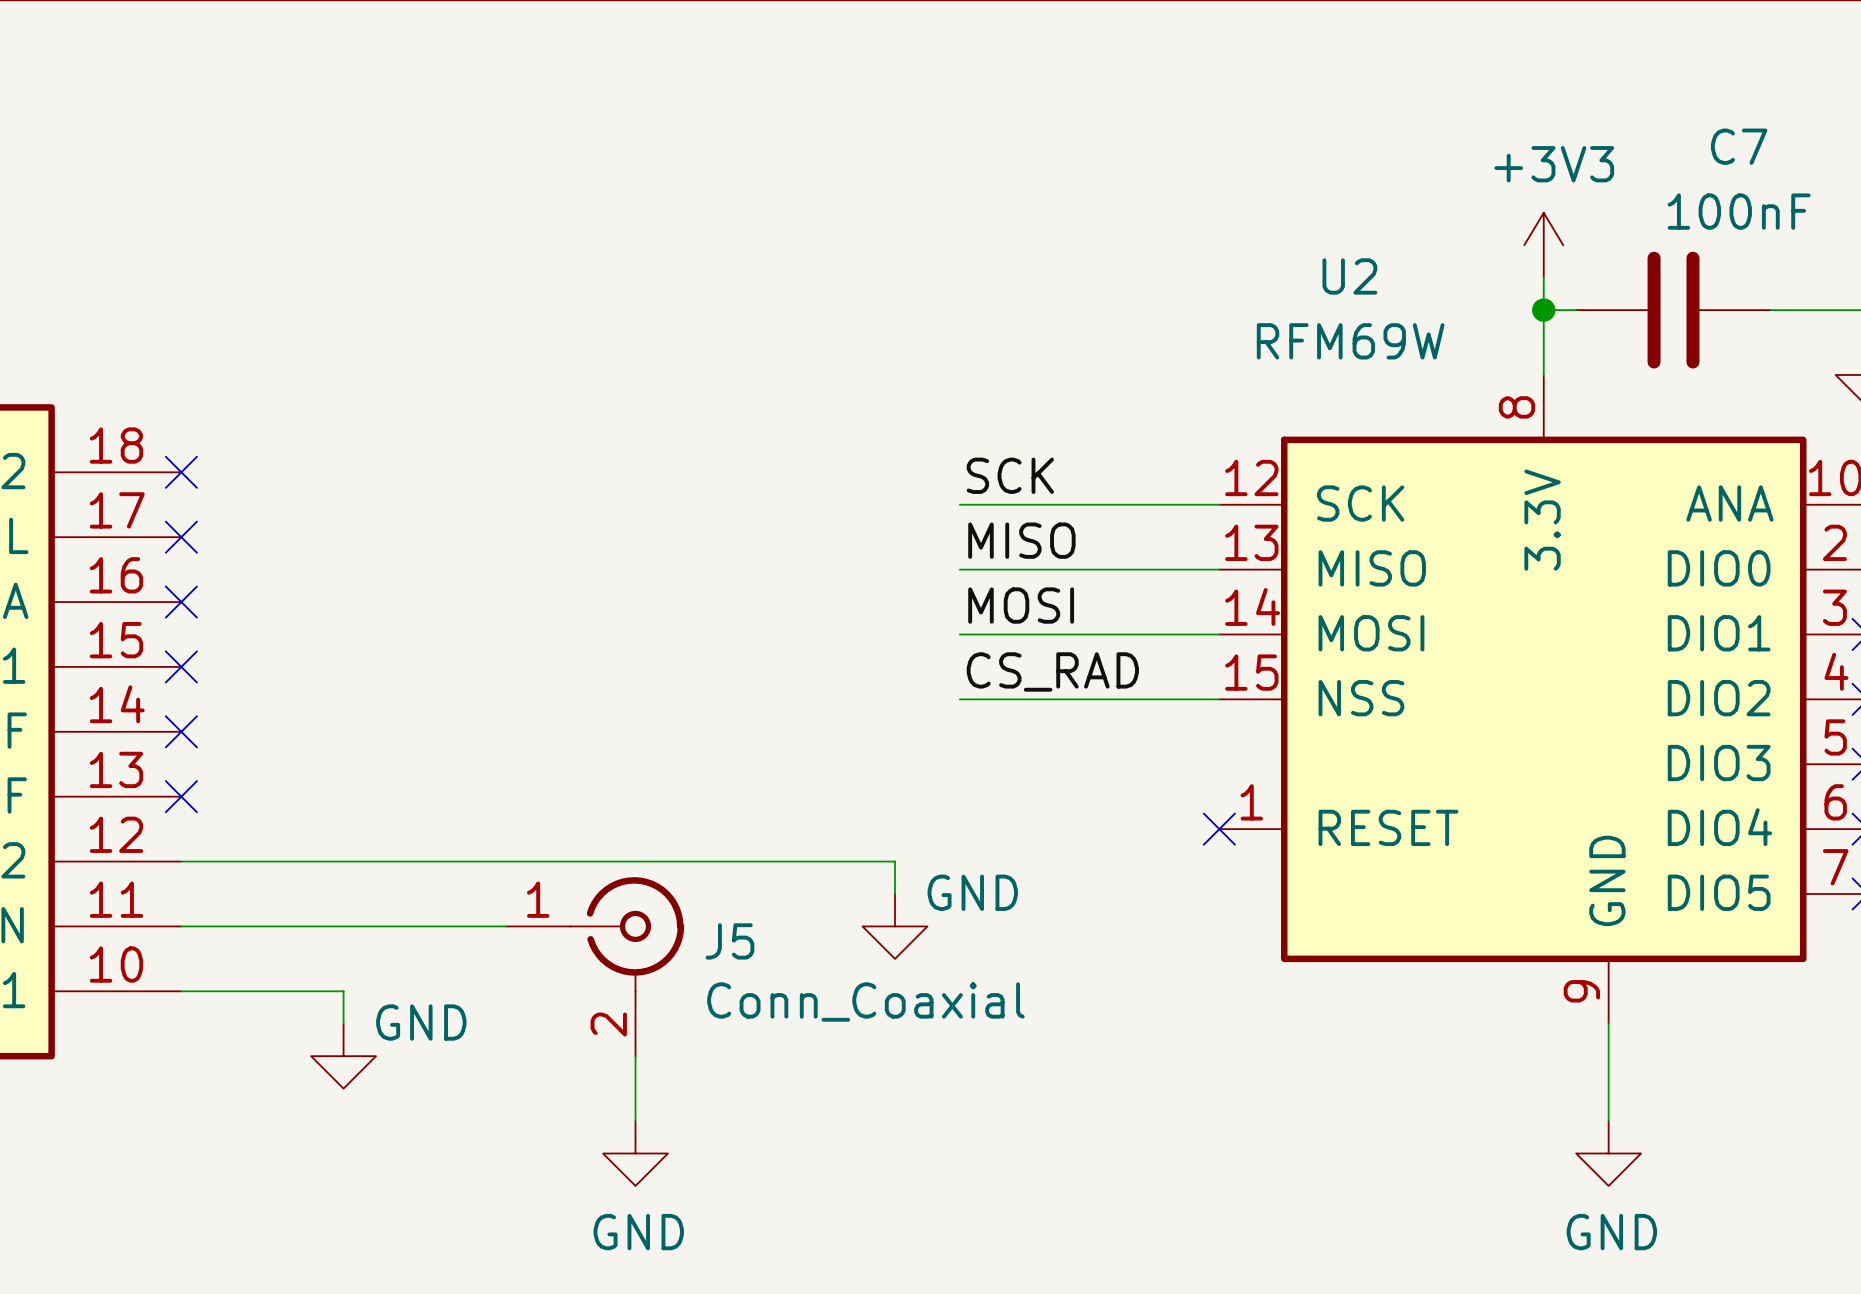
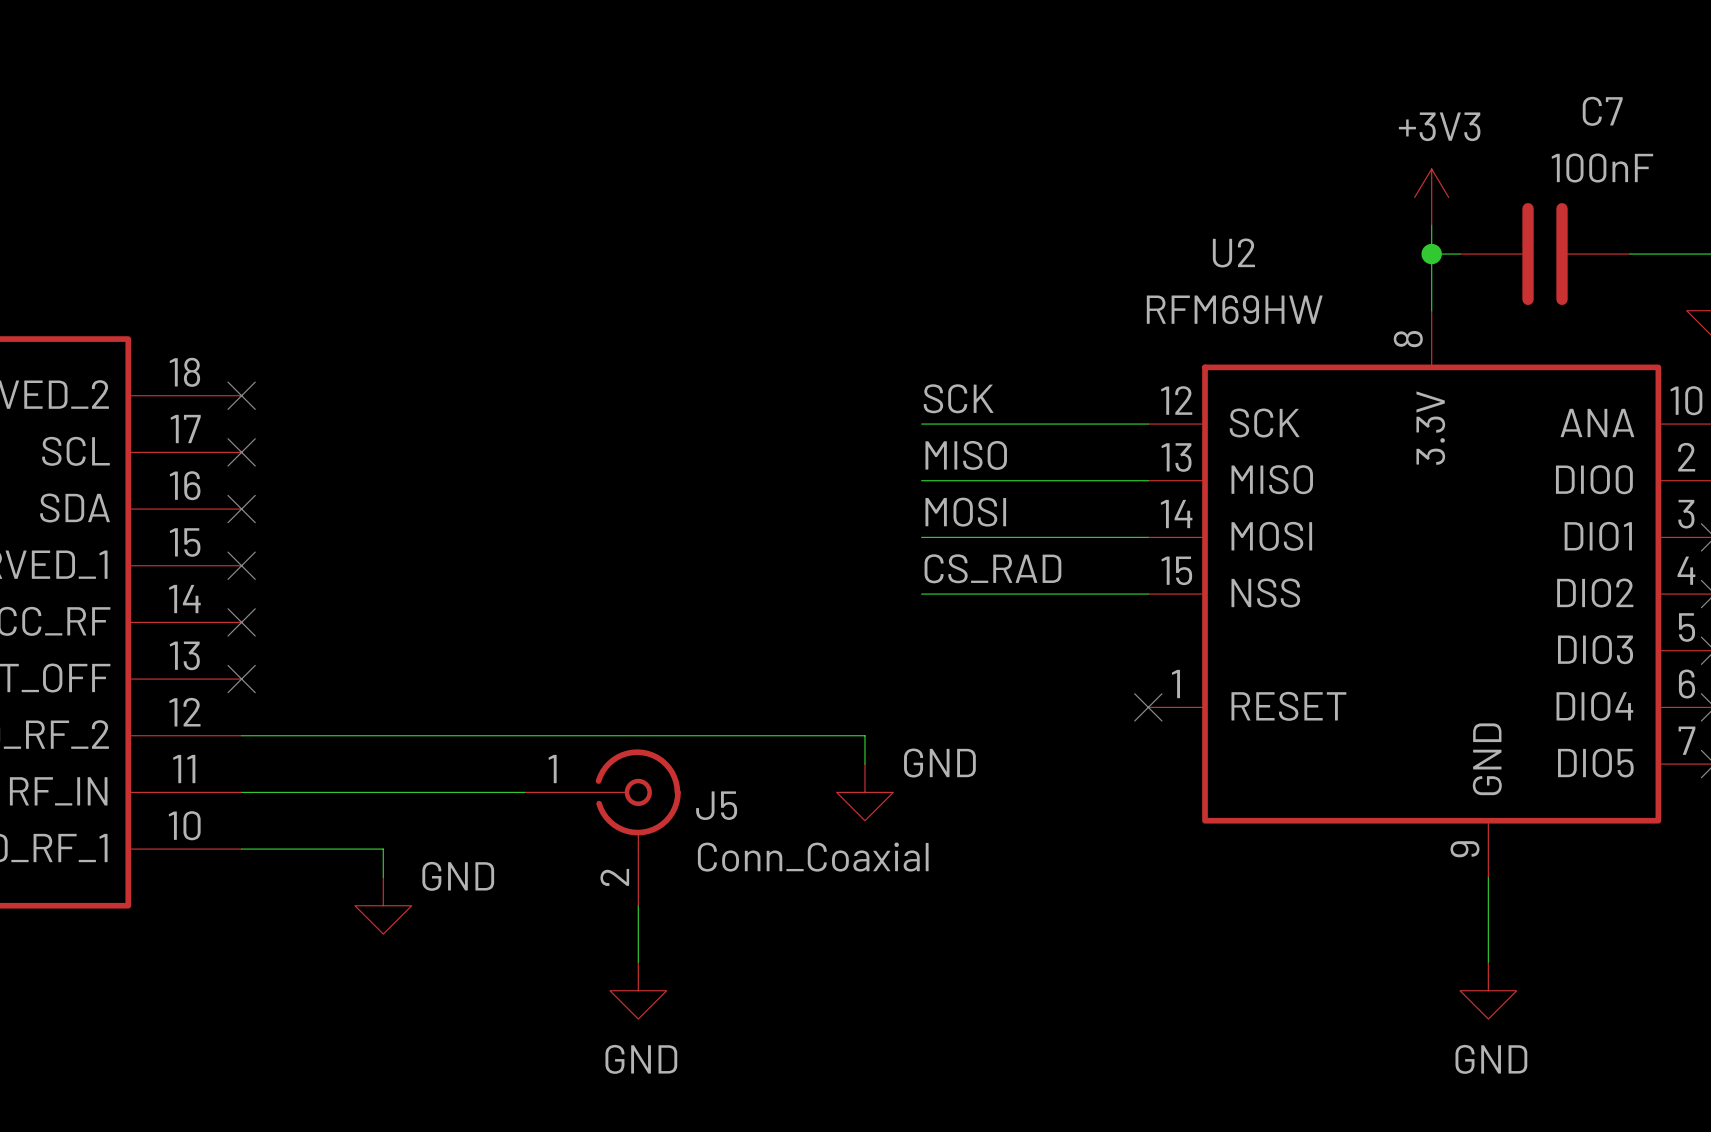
U2 name position: U2 (1349, 276) -> U2 (1233, 252)
U2 value: RFM69W (1350, 341) -> RFM69HW (1234, 309)

